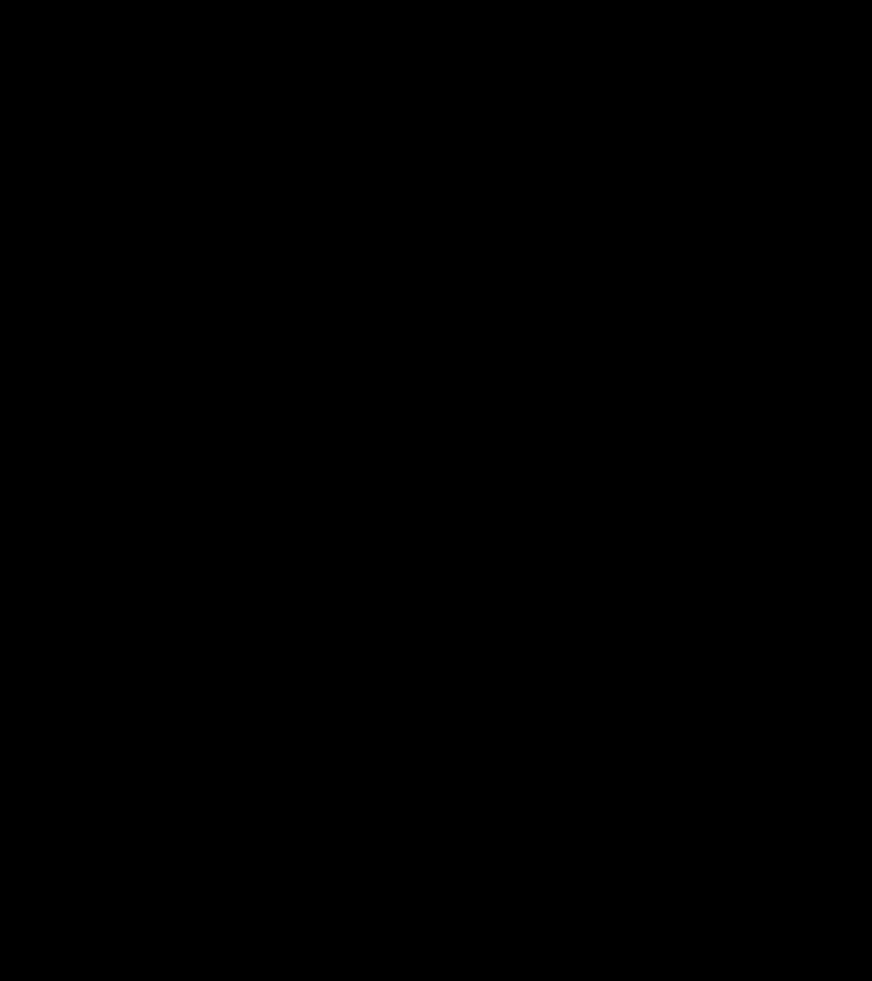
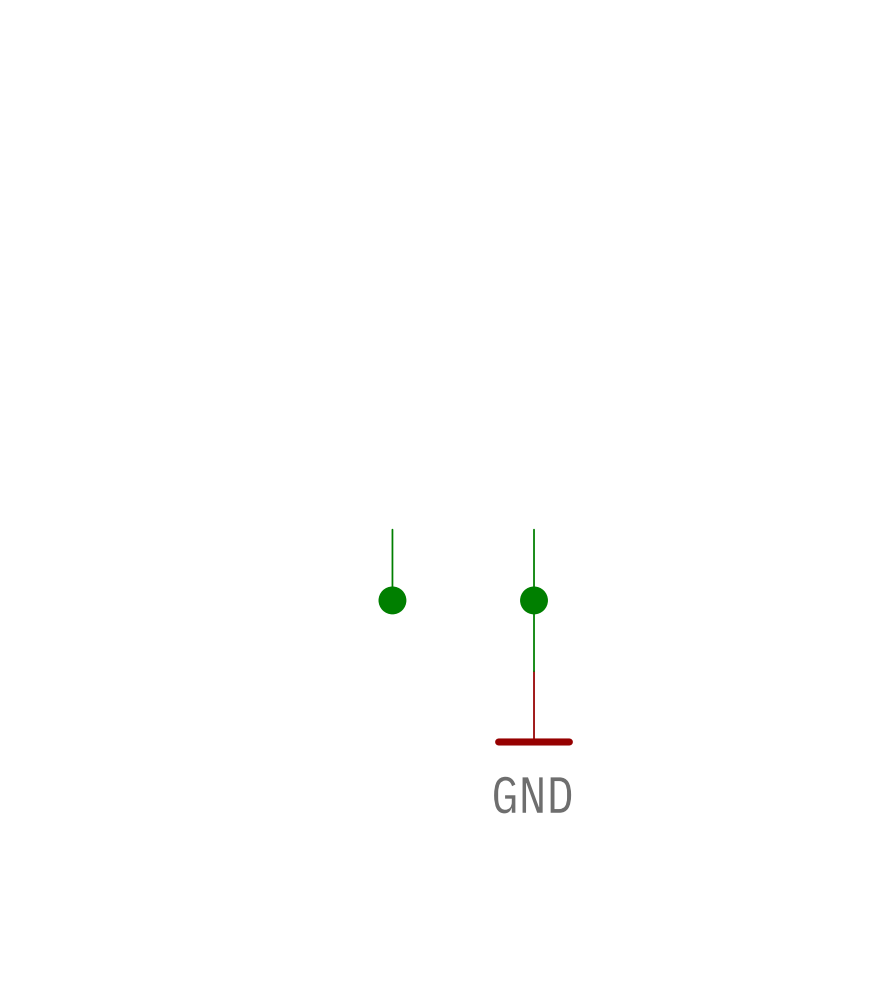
wire: none -> (392, 529) (392, 600)
wire: none -> (534, 529) (534, 671)
junction: none -> (392, 600)
junction: none -> (534, 600)
power symbol: none -> GND (534, 708)

